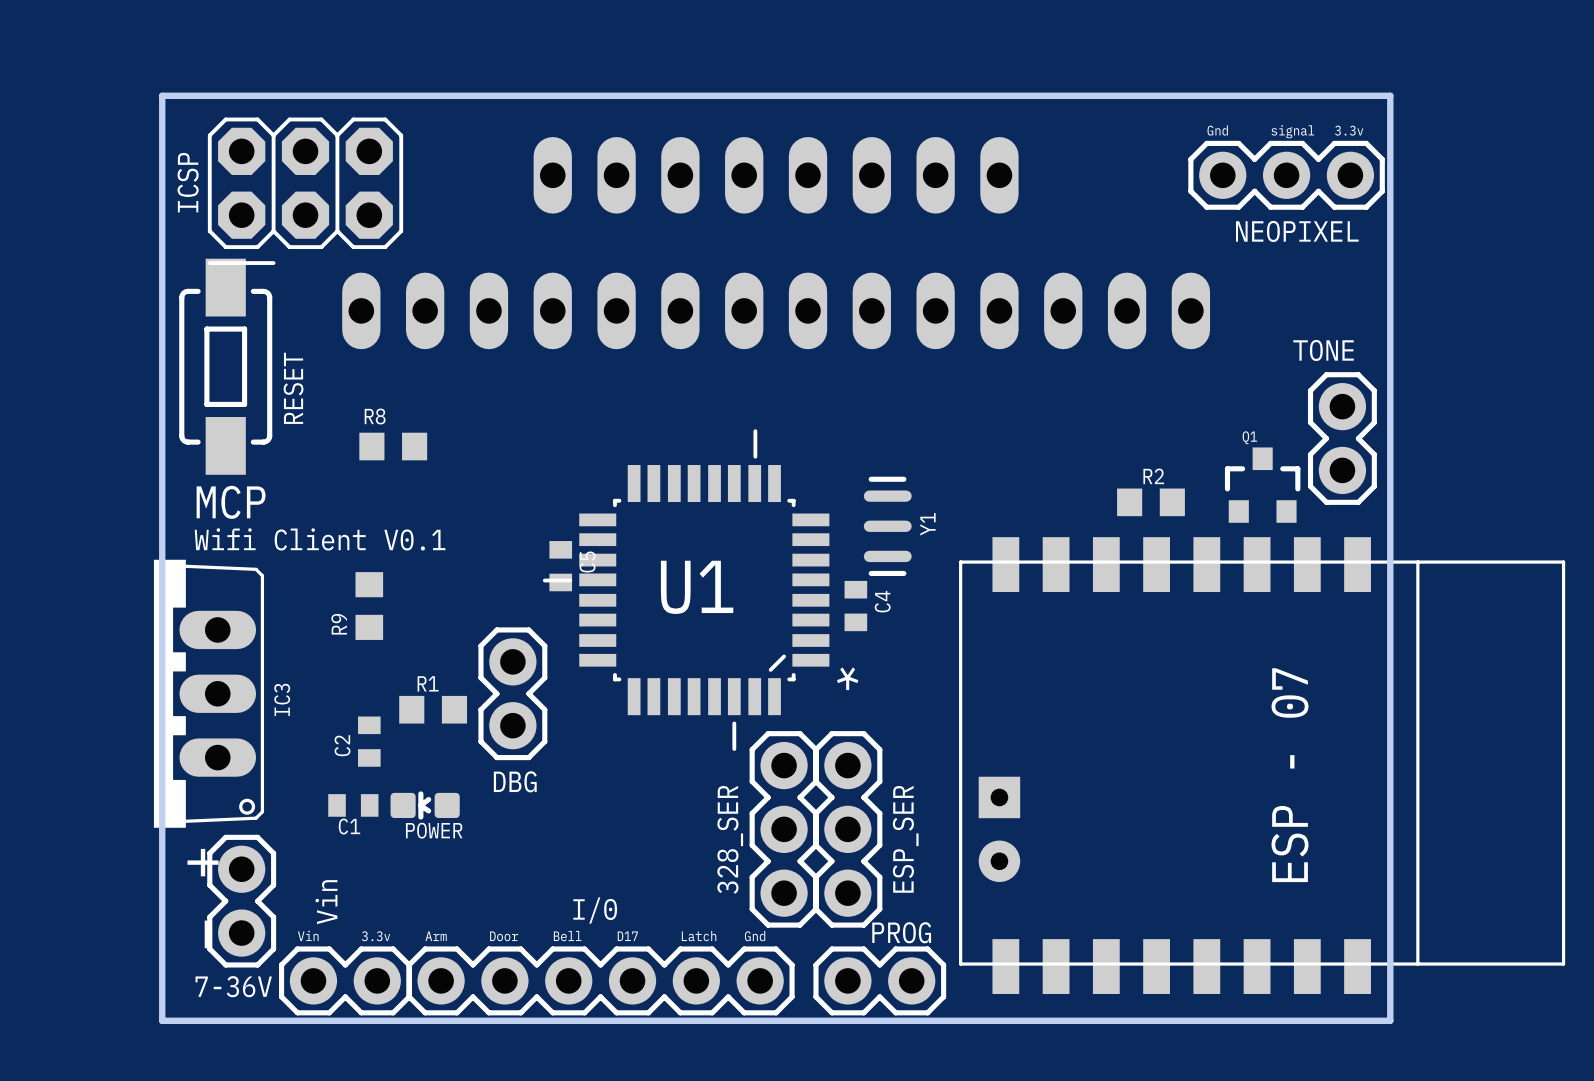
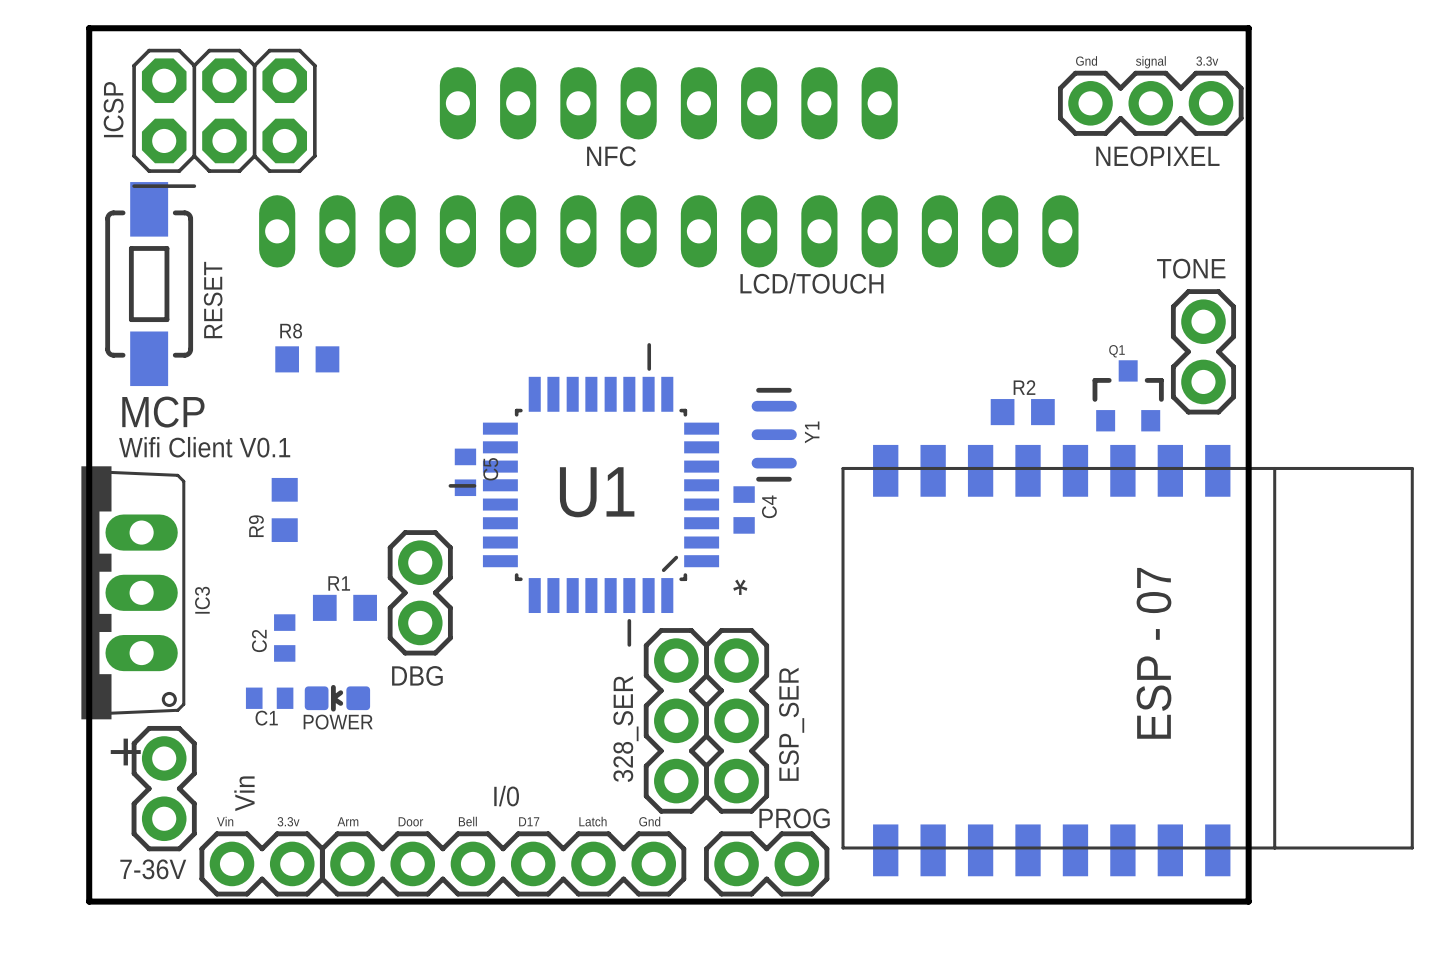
NFC name: none -> NFC (611, 156)
LCD/TOUCH name: none -> LCD/TOUCH (811, 283)
part: (999, 829) -> none

